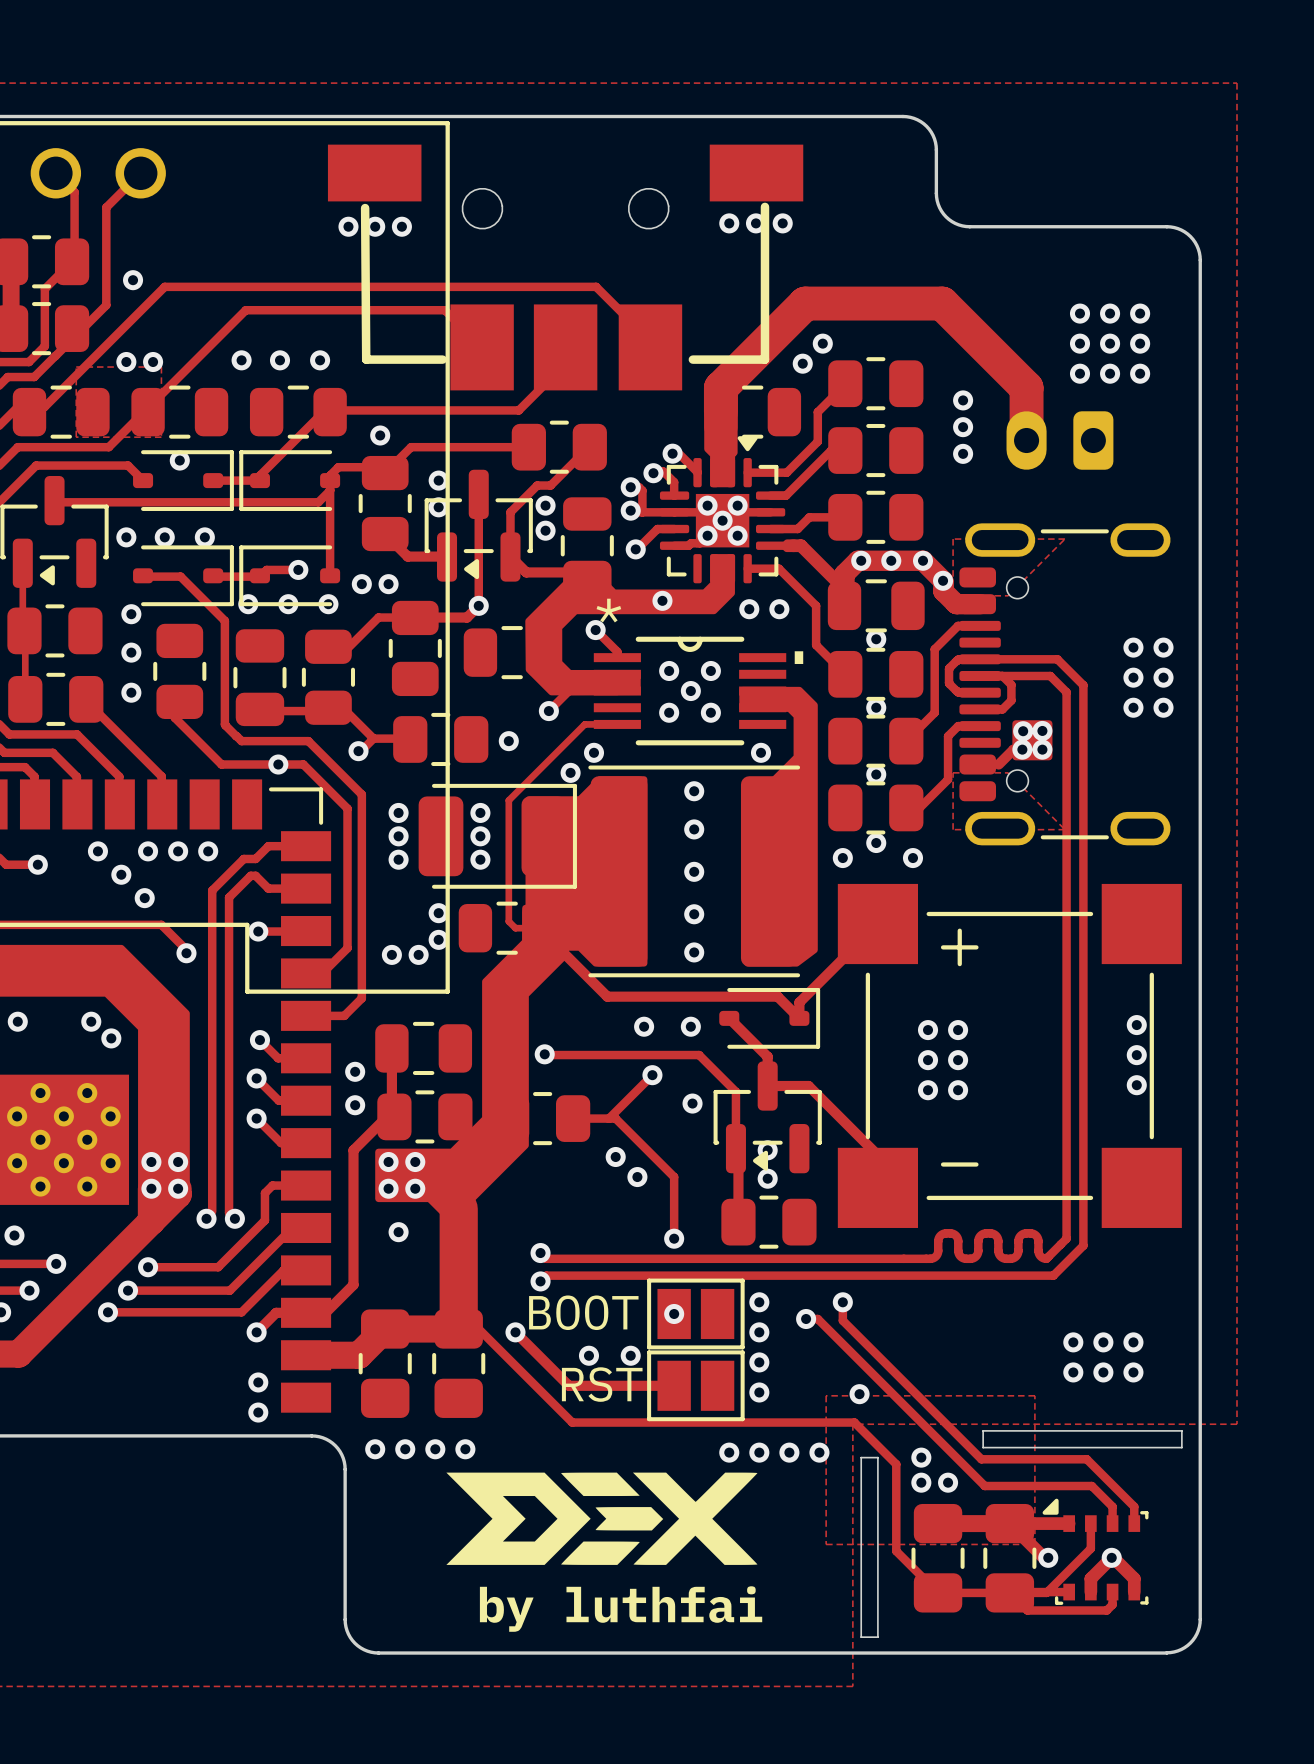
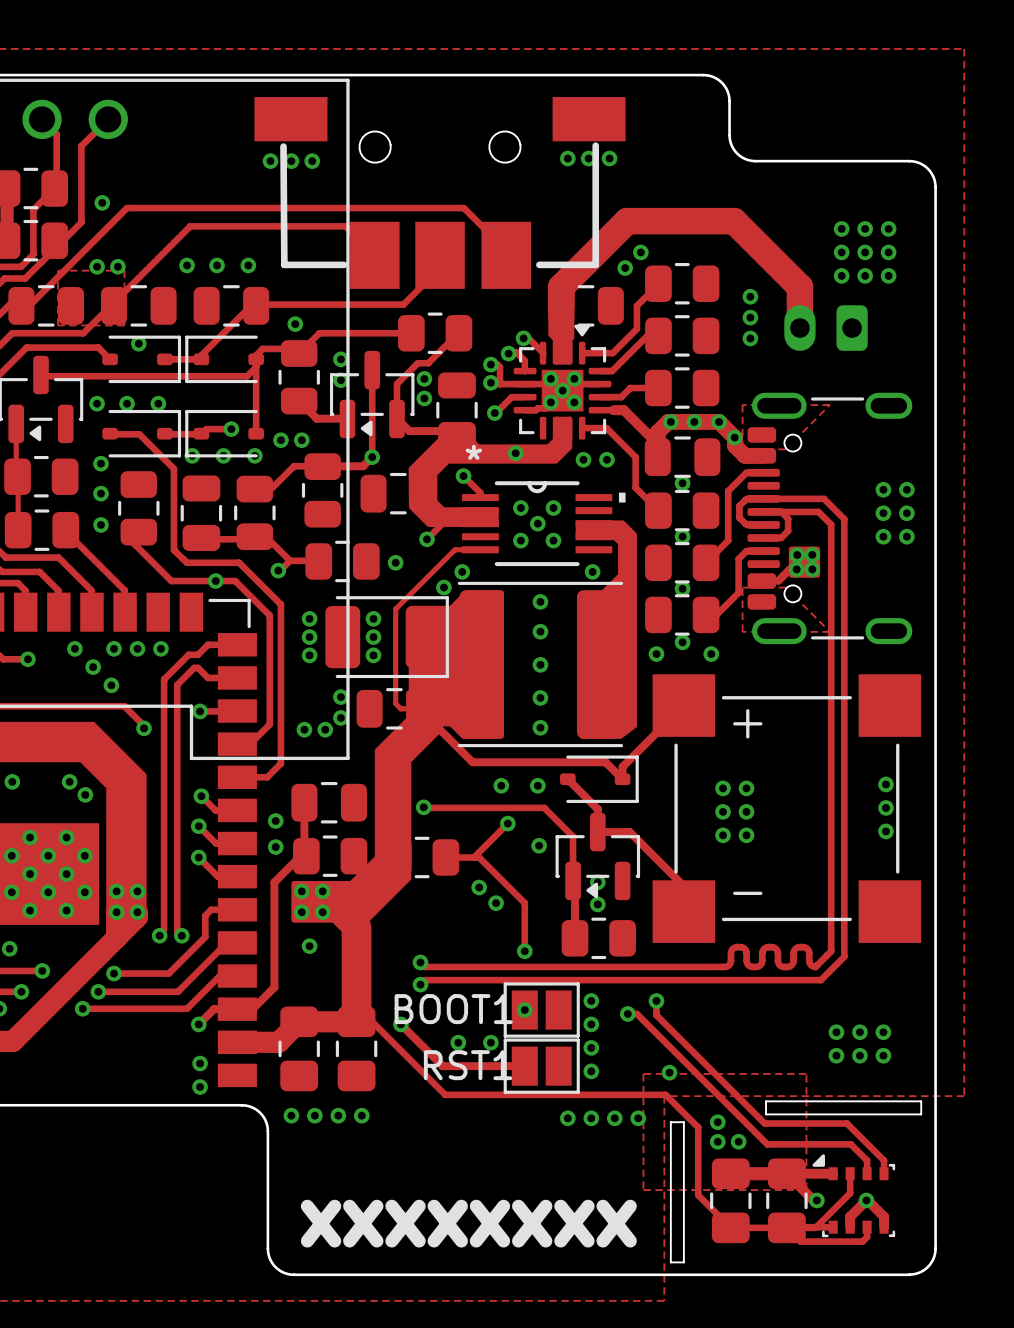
BOOT name: BOOT (583, 1312) -> BOOT1 (453, 1009)
RST name: RST (602, 1384) -> RST1 (468, 1065)
drawing: [446, 1472, 758, 1565] -> none
text: none -> xxxxxxxx (468, 1223)
text: by luthfai (621, 1609) -> none

